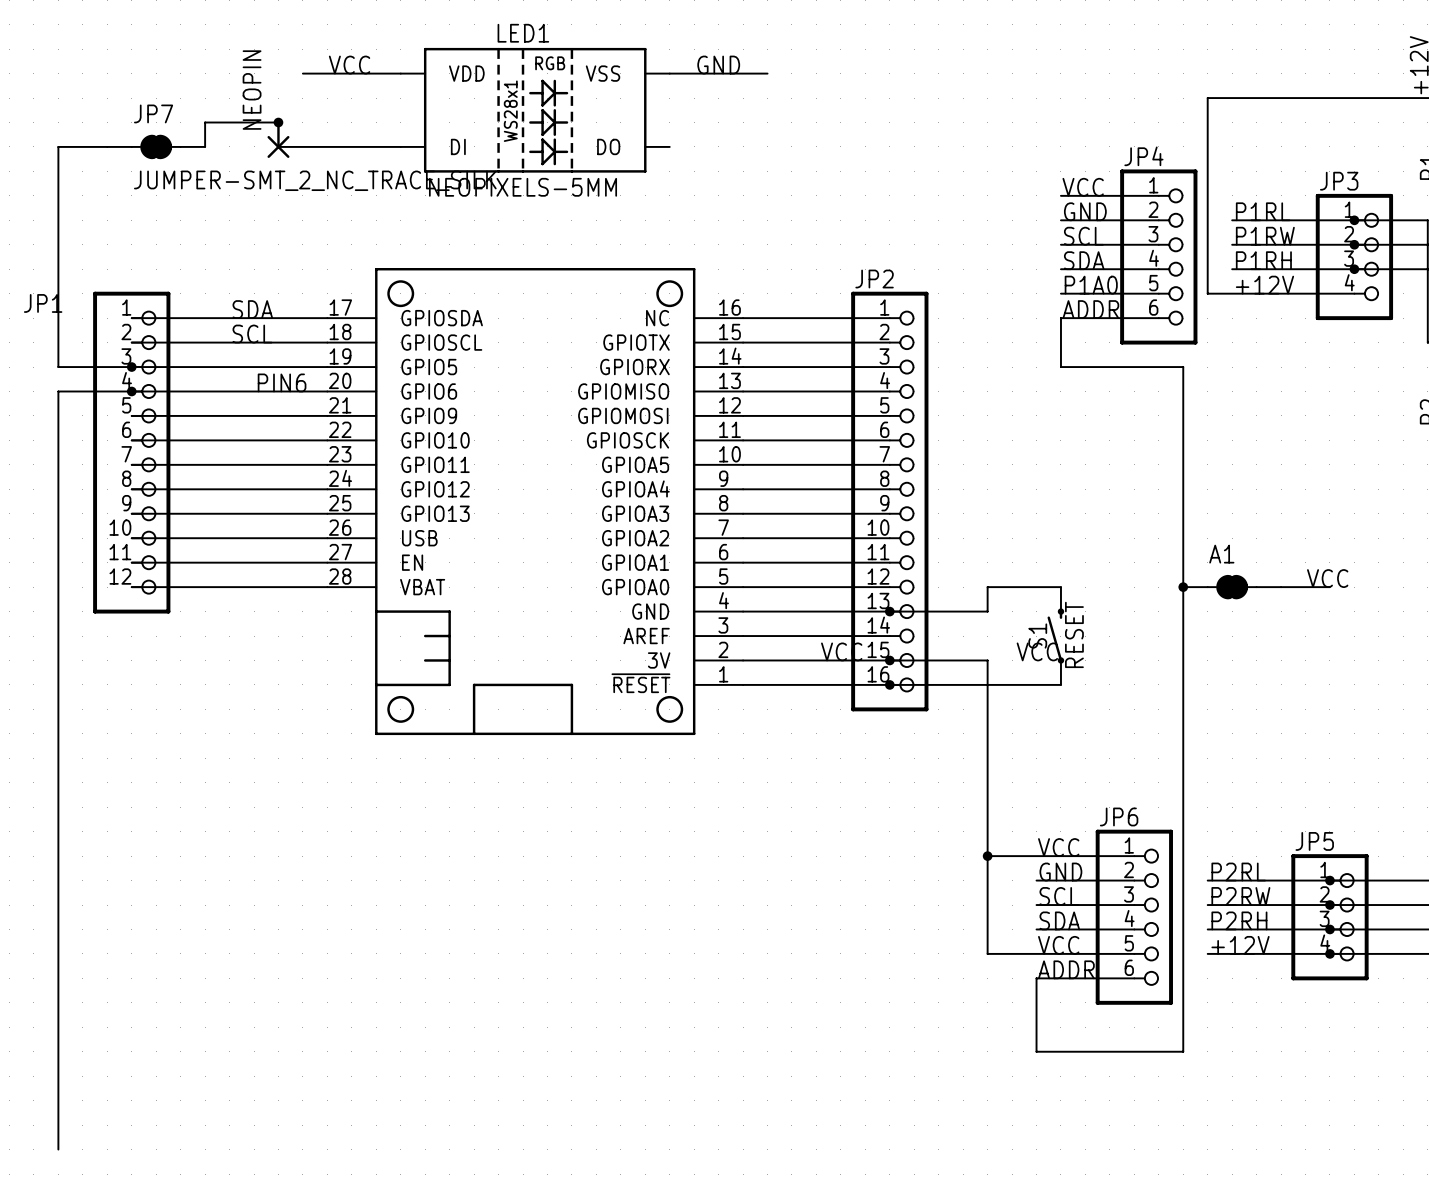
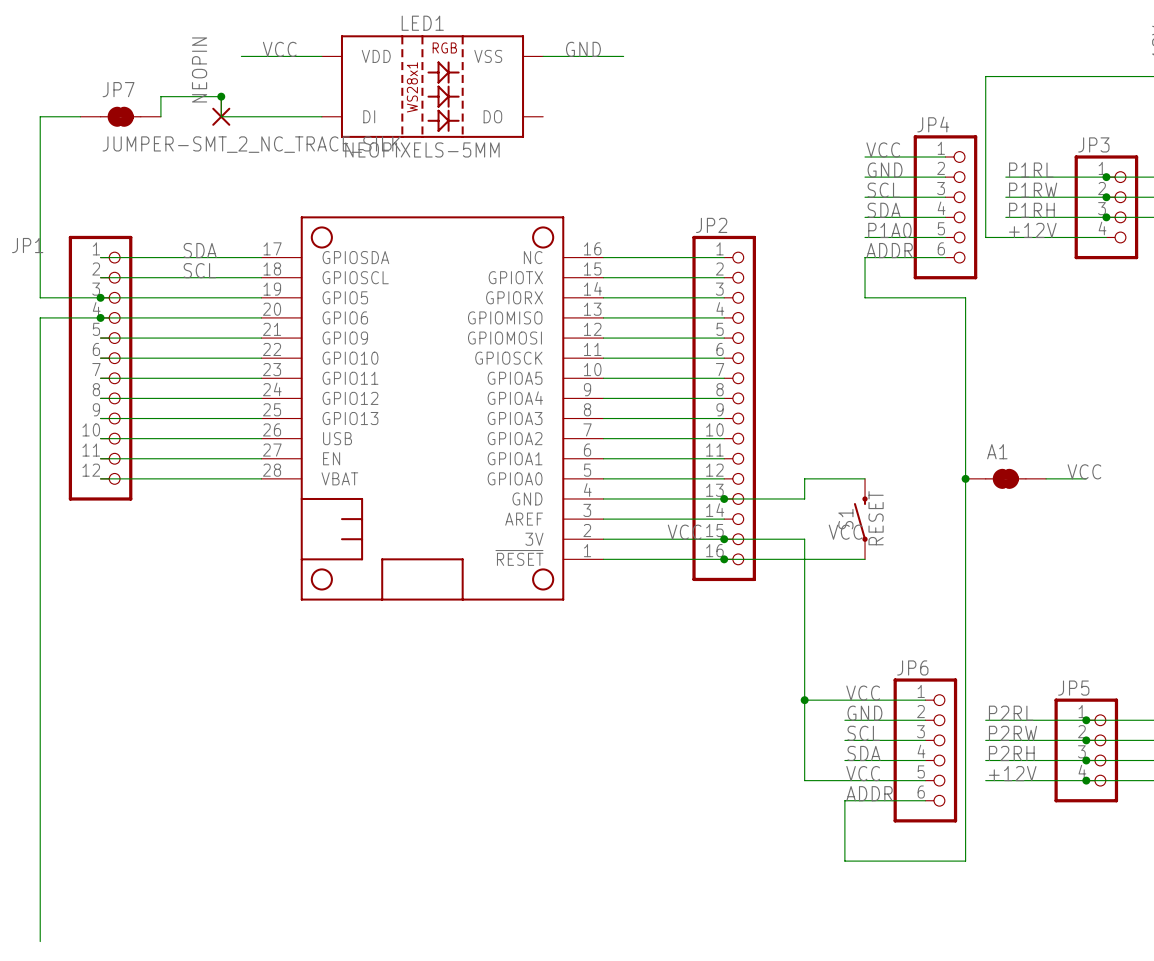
label: PIN6 (282, 382) -> none

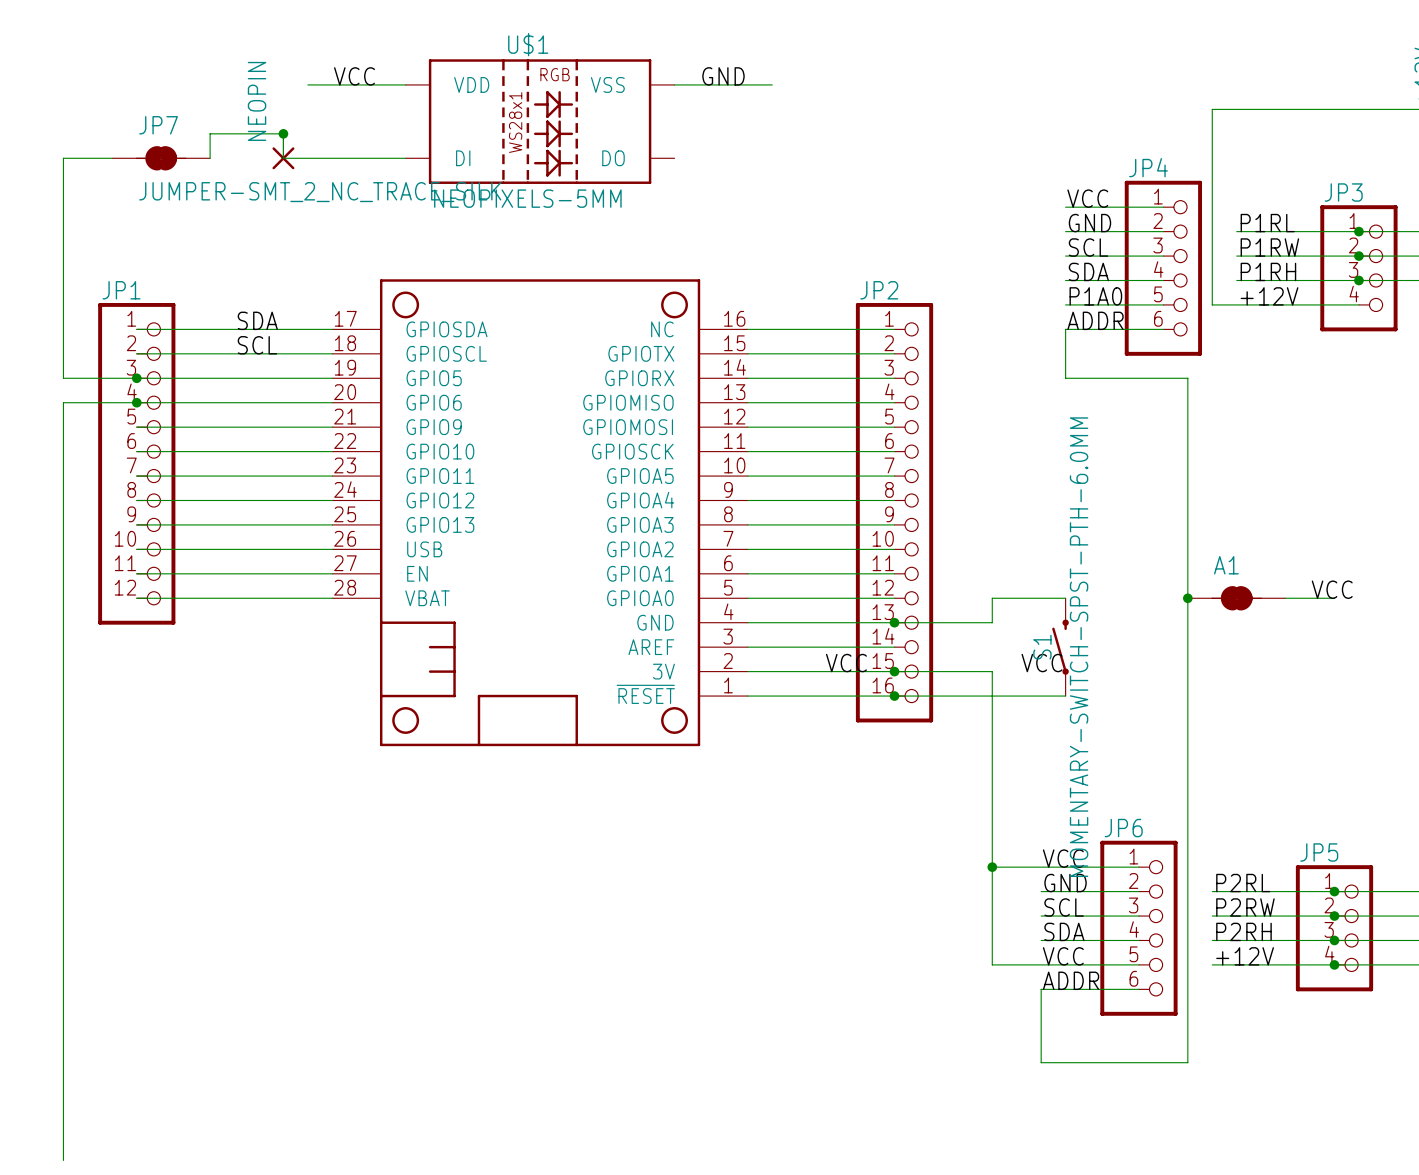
LED1 name: LED1 (422, 23) -> U$1 (528, 44)
JP1 name position: JP1 (27, 245) -> JP1 (121, 290)
S1 value: RESET (876, 518) -> MOMENTARY-SWITCH-SPST-PTH-6.0MM (1079, 647)

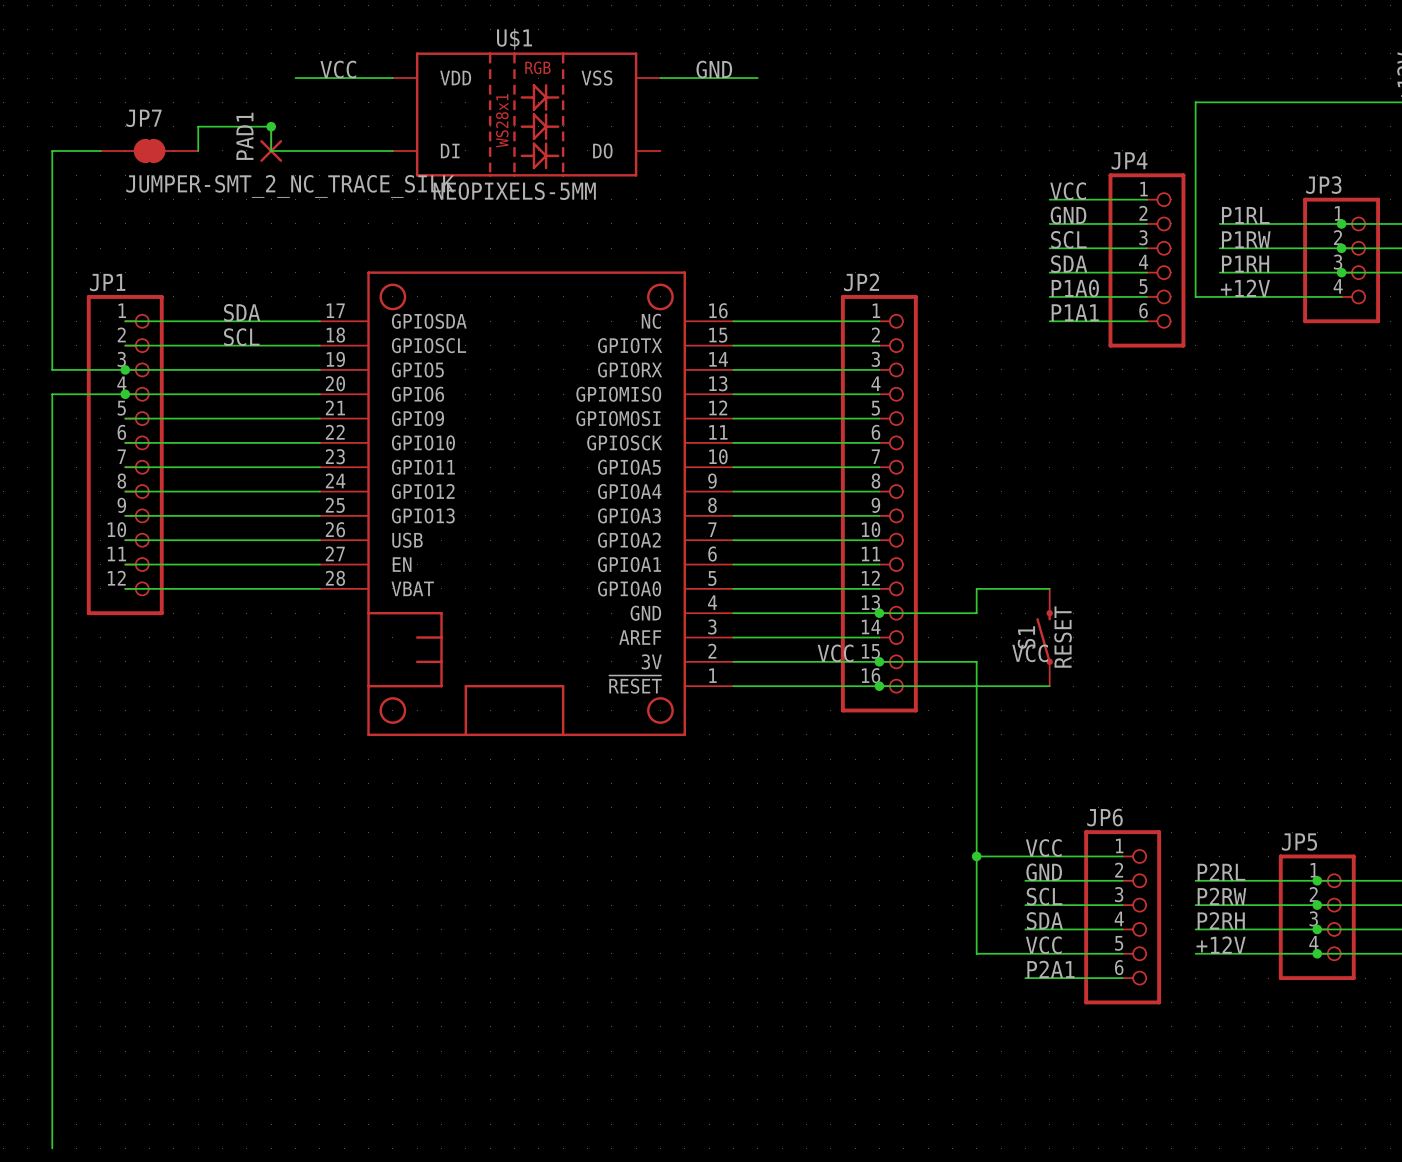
NEOPIN name: NEOPIN (257, 101) -> PAD1 (244, 136)
label: ADDR (1095, 320) -> P1A1 (1075, 312)
wire: (1065, 329) (1065, 378) (1187, 378) (1187, 1062) (1041, 1062) (1041, 989) -> none
label: VCC (1332, 589) -> none
junction: (1187, 598) -> none
A1: (1236, 598) -> none
wire: (1285, 598) (1334, 598) -> none
S1 value: MOMENTARY-SWITCH-SPST-PTH-6.0MM (1079, 647) -> RESET (1063, 637)
label: ADDR (1071, 980) -> P2A1 (1050, 969)

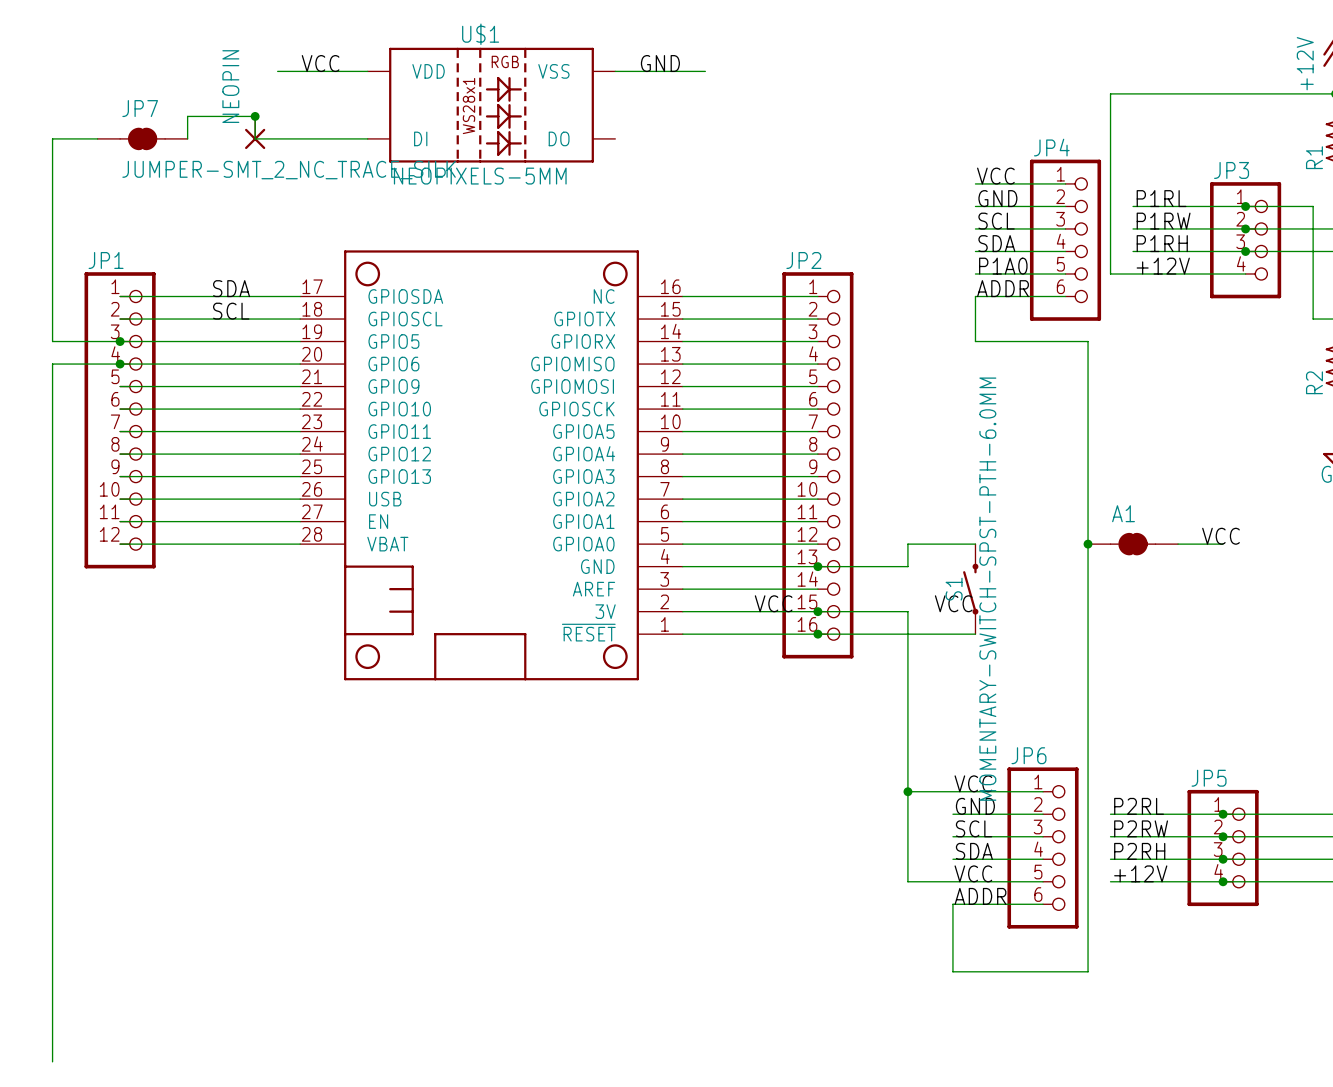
PAD1 name: PAD1 (244, 136) -> NEOPIN (230, 86)
label: P1A1 (1075, 312) -> ADDR (1002, 288)
wire: none -> (975, 296) (975, 341) (1088, 341) (1088, 971) (952, 971) (952, 904)
label: none -> VCC (1220, 536)
junction: none -> (1088, 544)
A1: none -> (1133, 544)
wire: none -> (1178, 544) (1223, 544)
S1 value: RESET (1063, 637) -> MOMENTARY-SWITCH-SPST-PTH-6.0MM (987, 589)
label: P2A1 (1050, 969) -> ADDR (980, 896)

